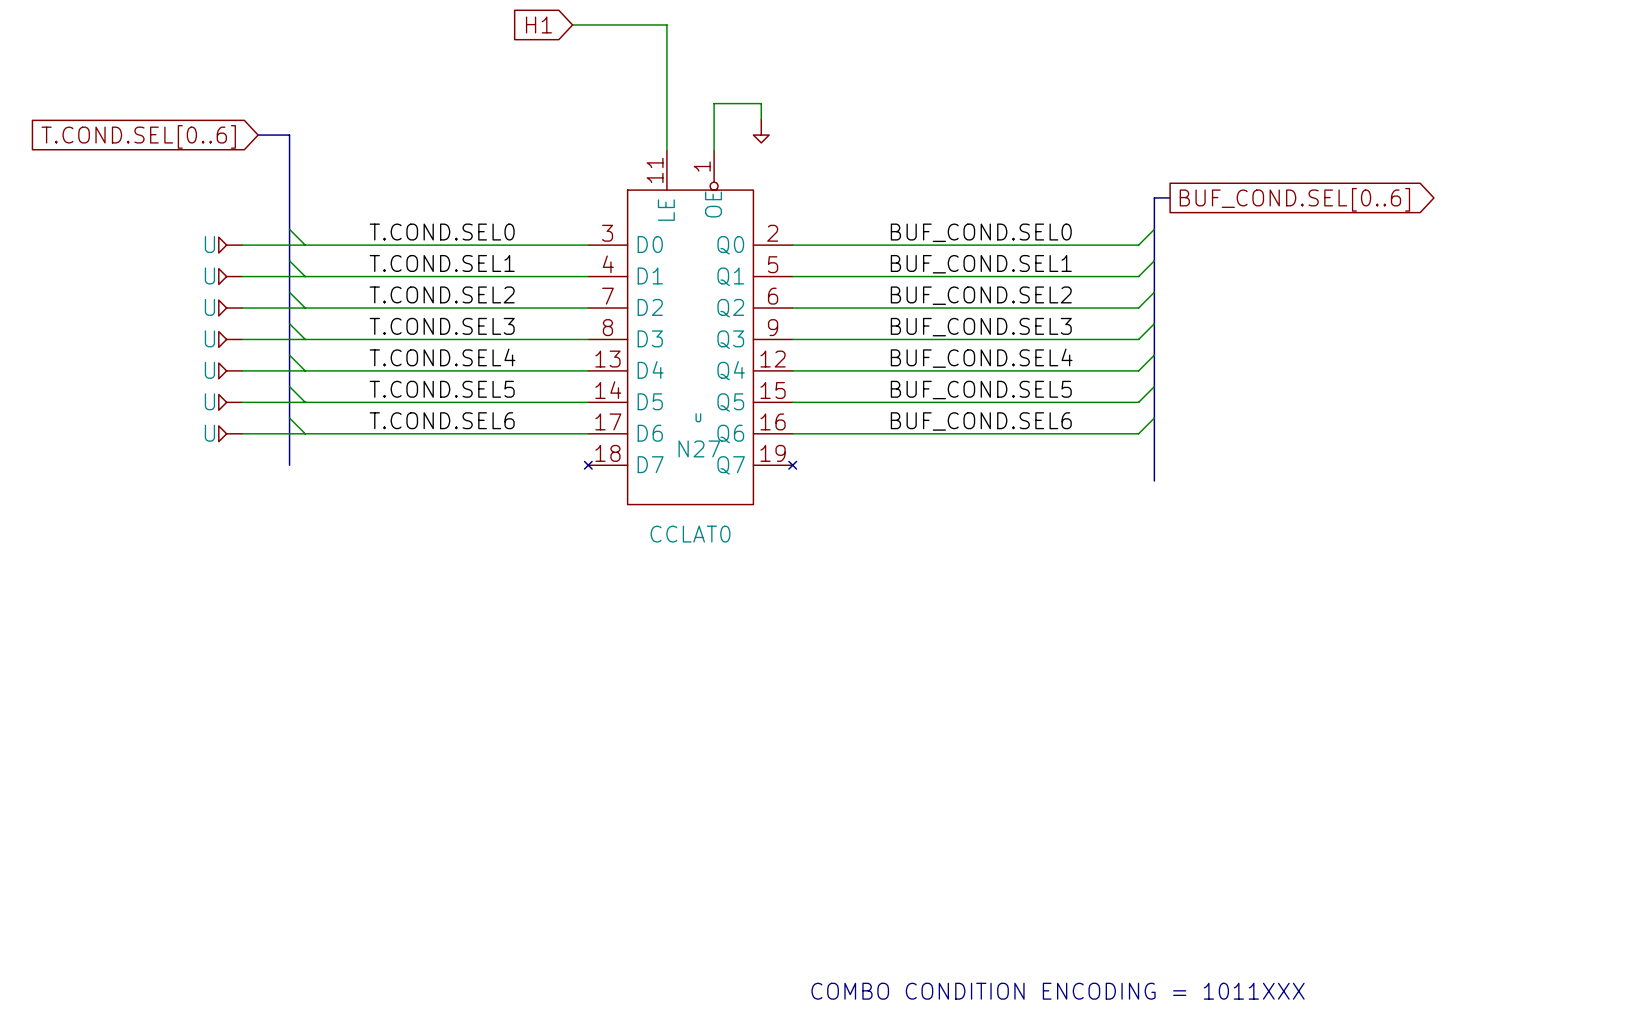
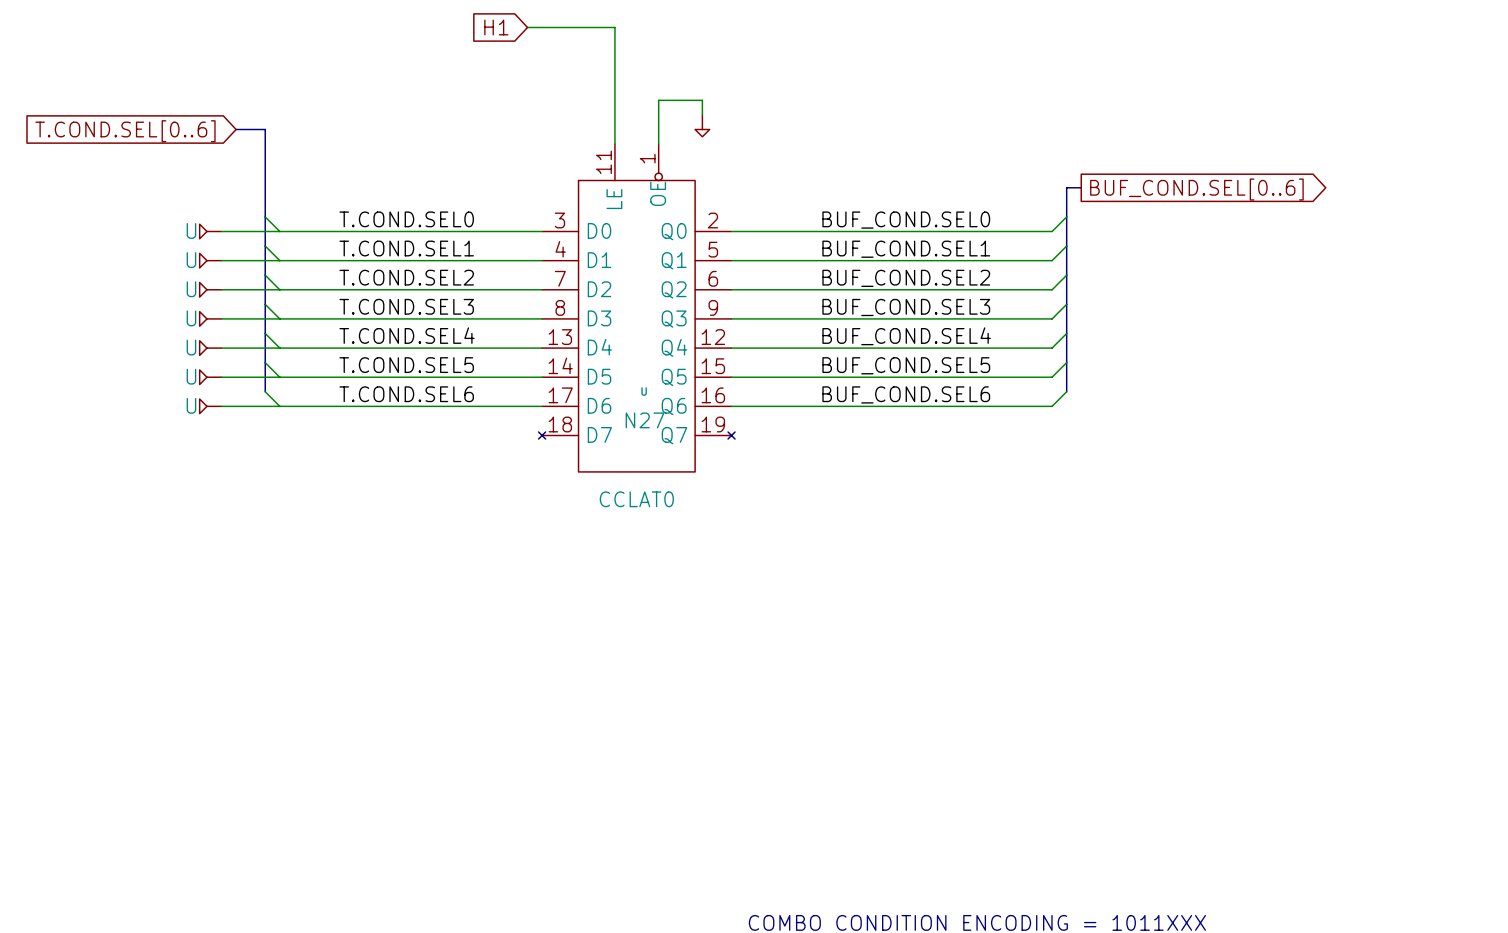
bus: (289, 418) (289, 465) -> none
bus: (1154, 418) (1154, 480) -> none

